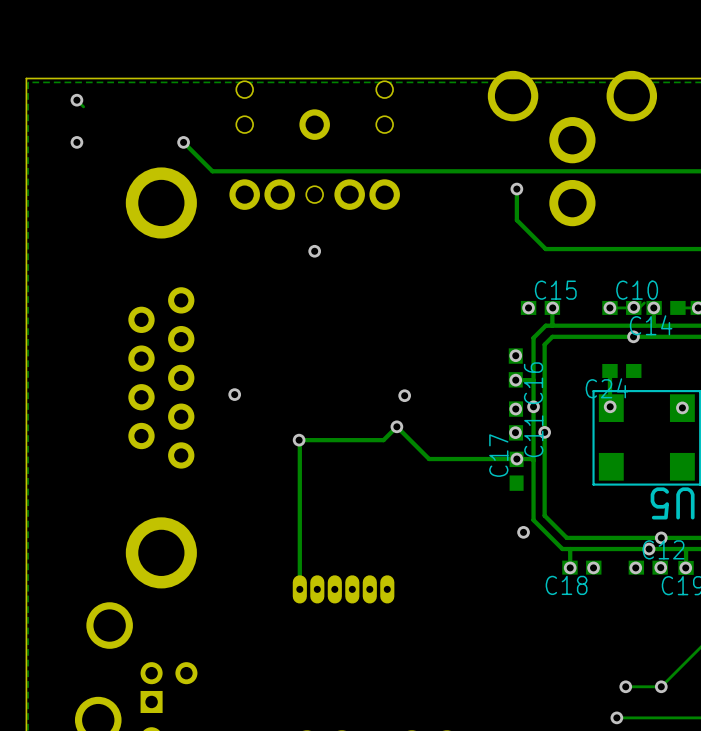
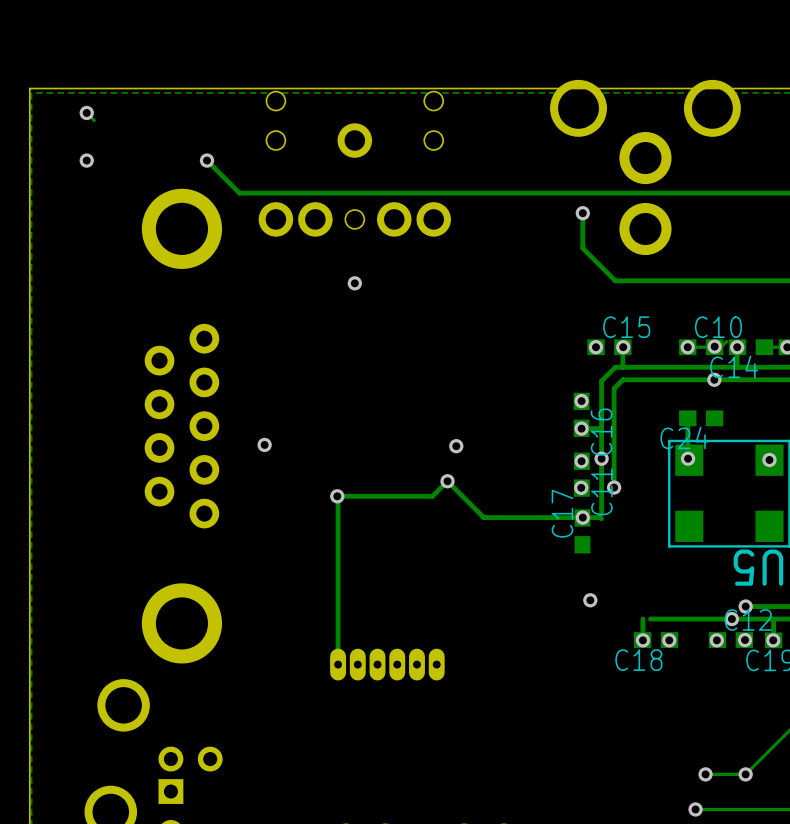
track: (544, 432) (544, 515) (566, 537) (661, 537) -> none
track: (533, 454) (533, 520) (562, 549) (576, 549) -> none

